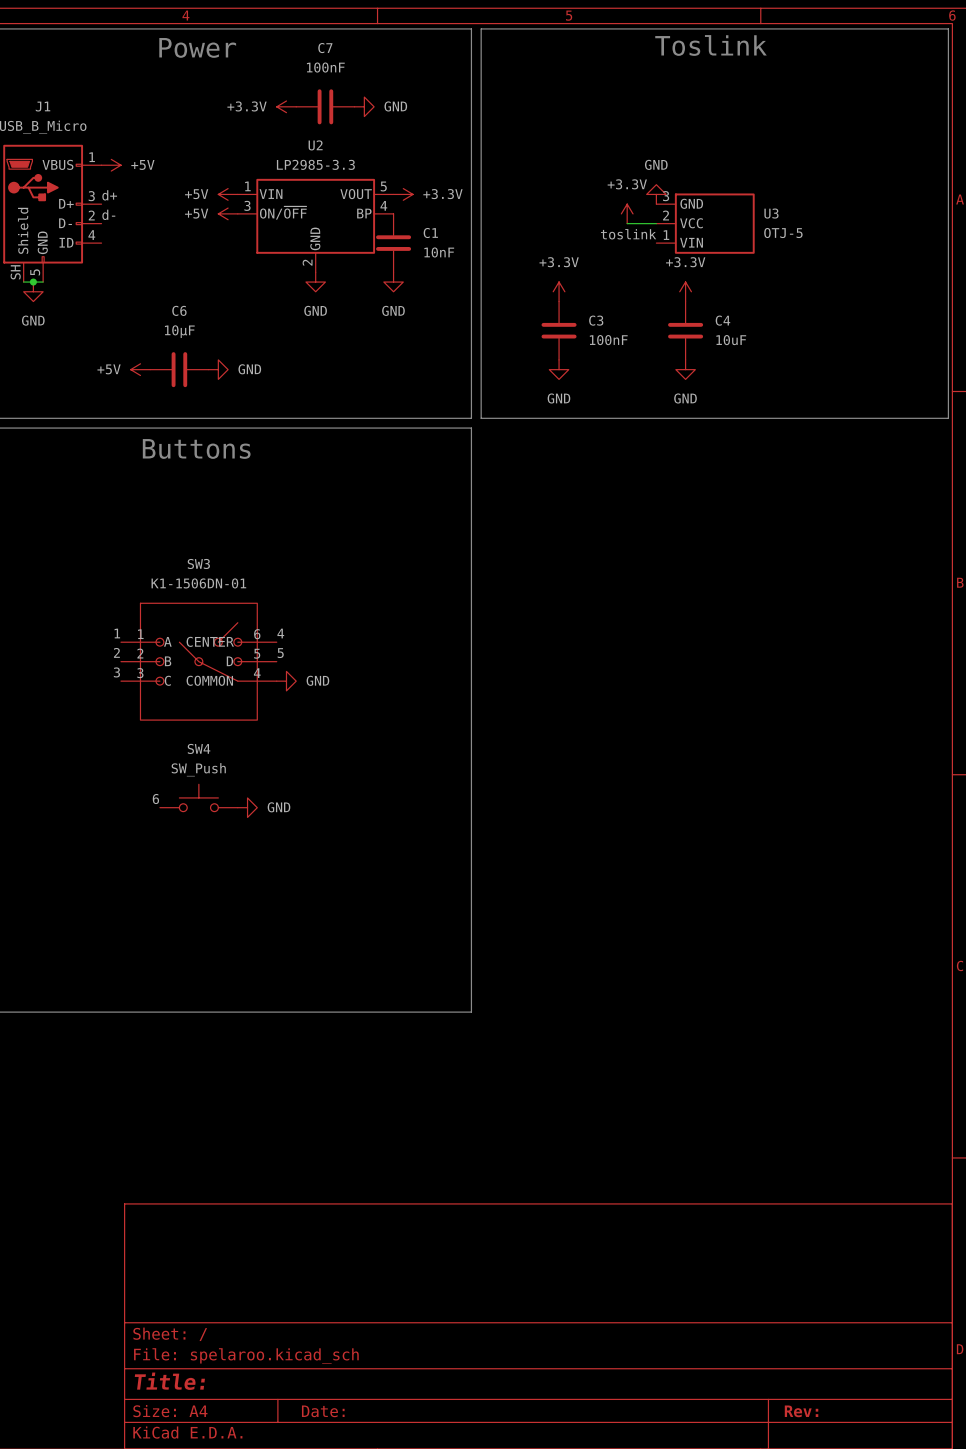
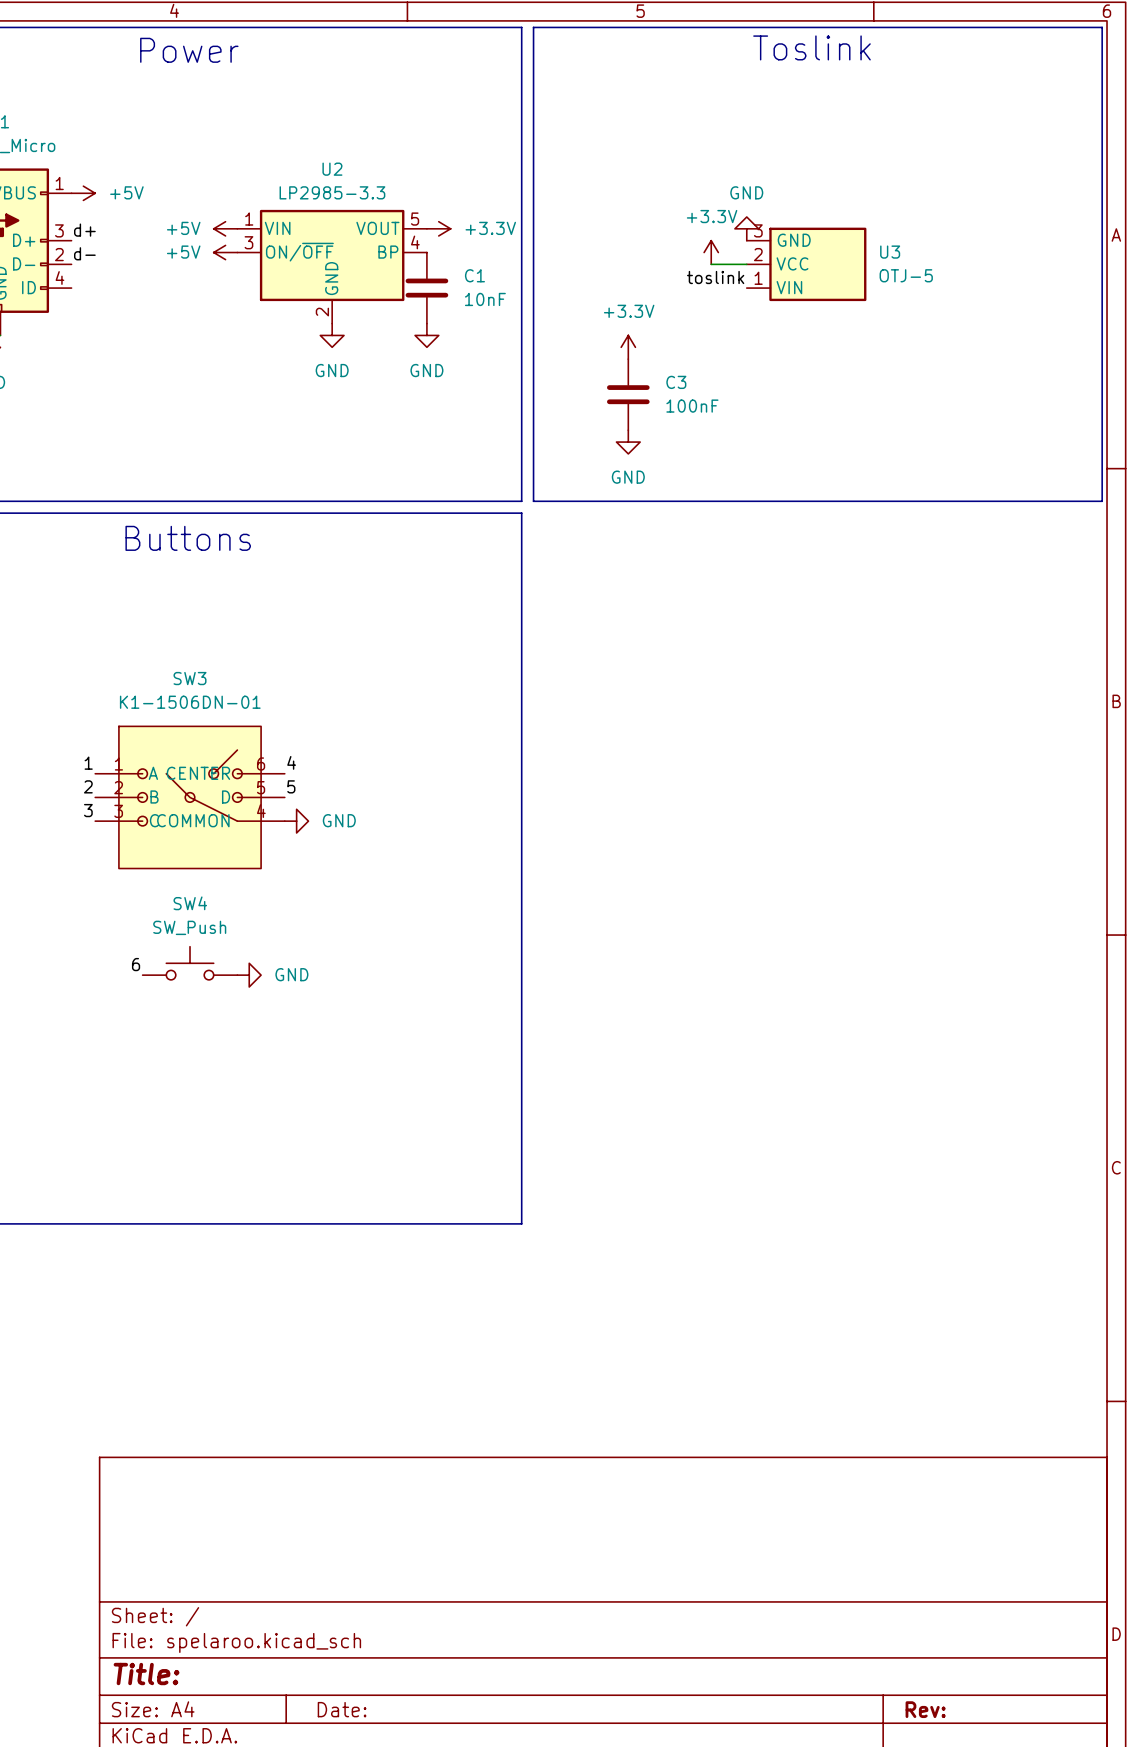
power symbol: +3.3V (286, 106) -> none
C7: 100nF (325, 106) -> none
power symbol: GND (364, 106) -> none
power symbol: +3.3V (685, 291) -> none
C4: 10uF (685, 330) -> none
power symbol: +5V (140, 369) -> none
C6: 10µF (179, 369) -> none
power symbol: GND (218, 369) -> none
power symbol: GND (685, 369) -> none

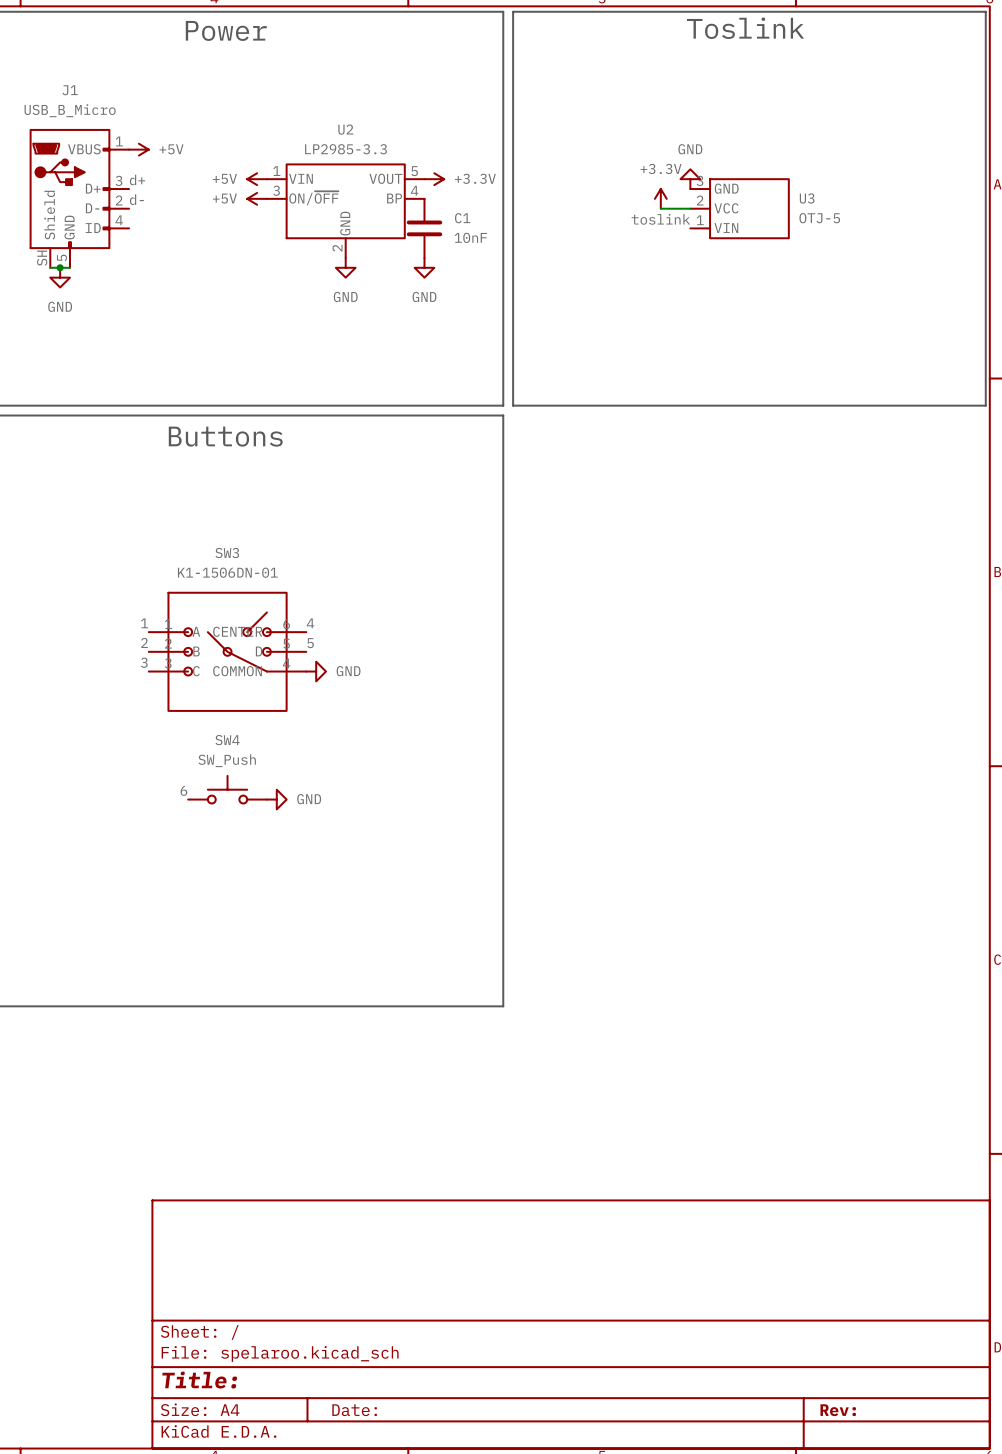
power symbol: +3.3V (628, 347) -> none
C3: 100nF (628, 394) -> none
power symbol: GND (628, 442) -> none

